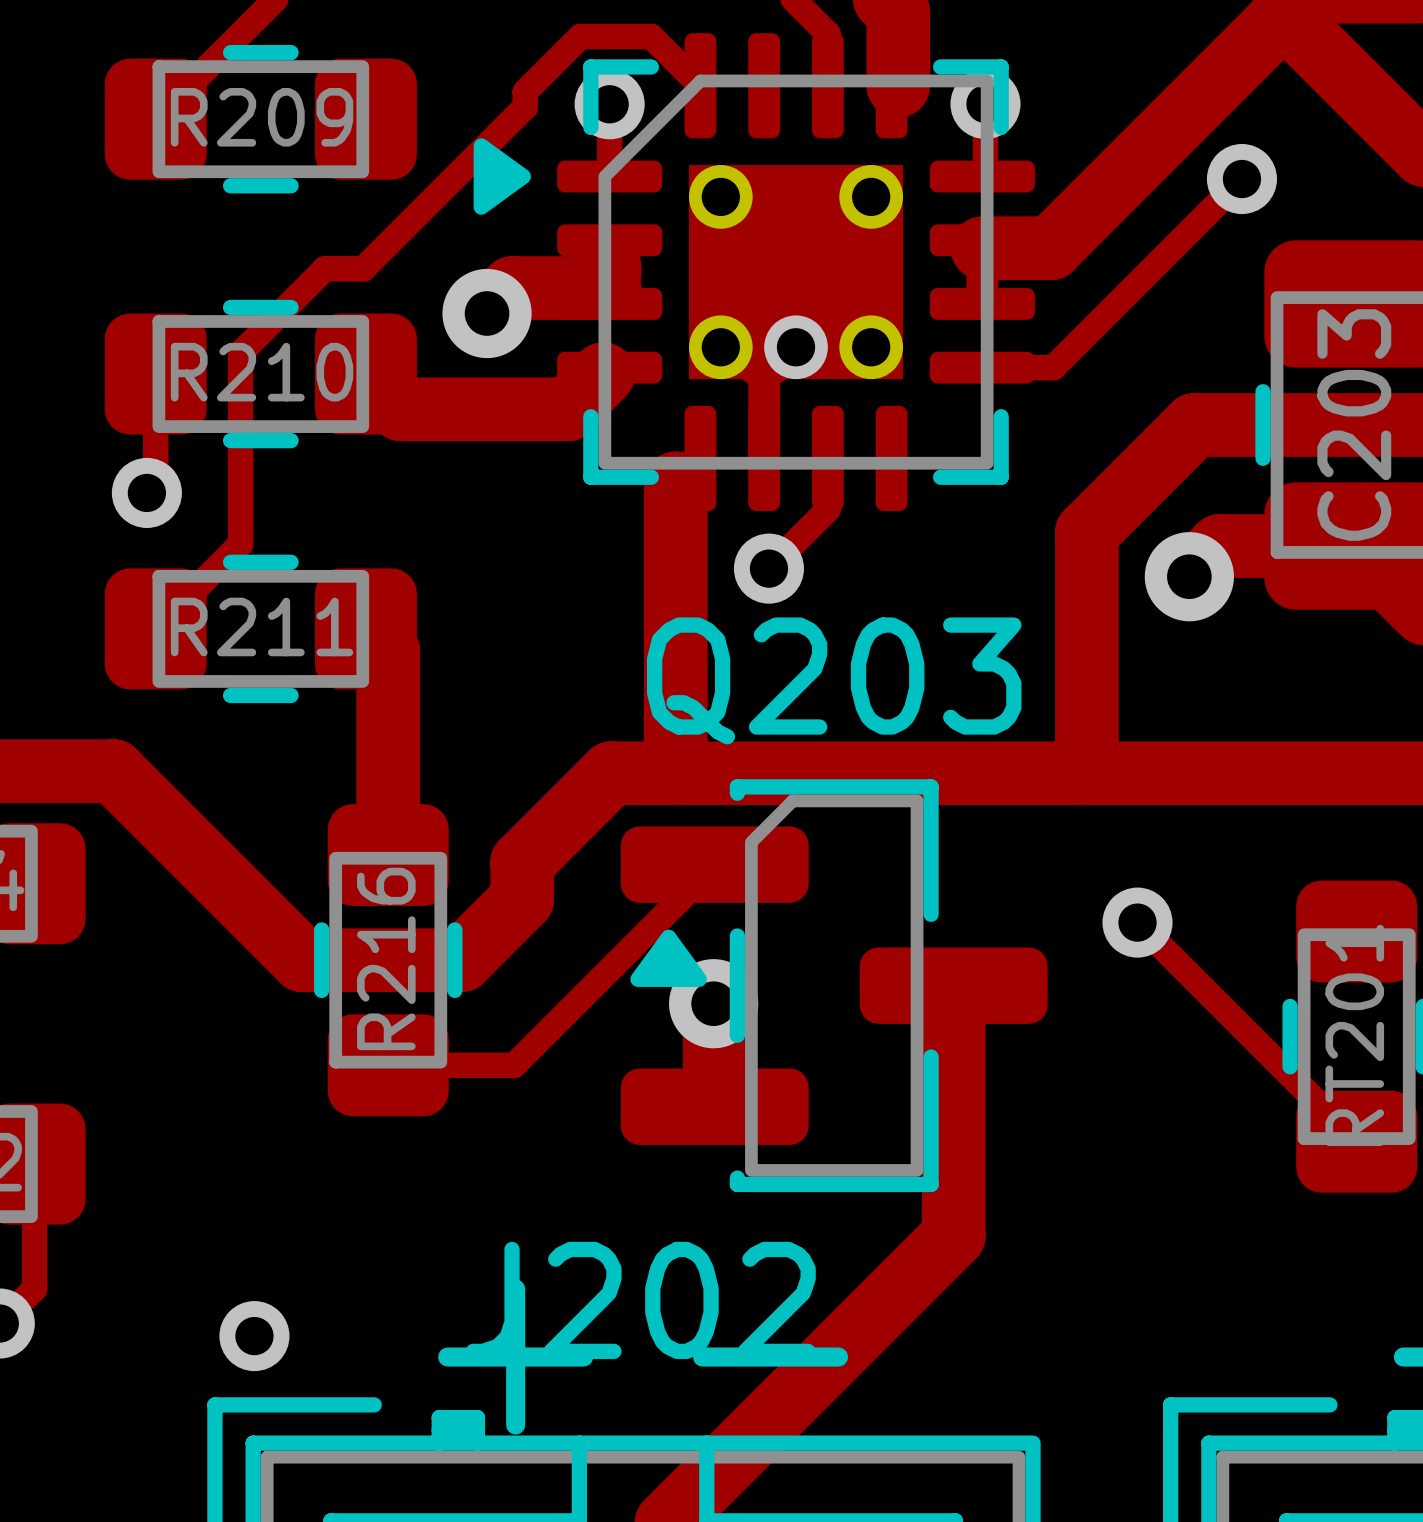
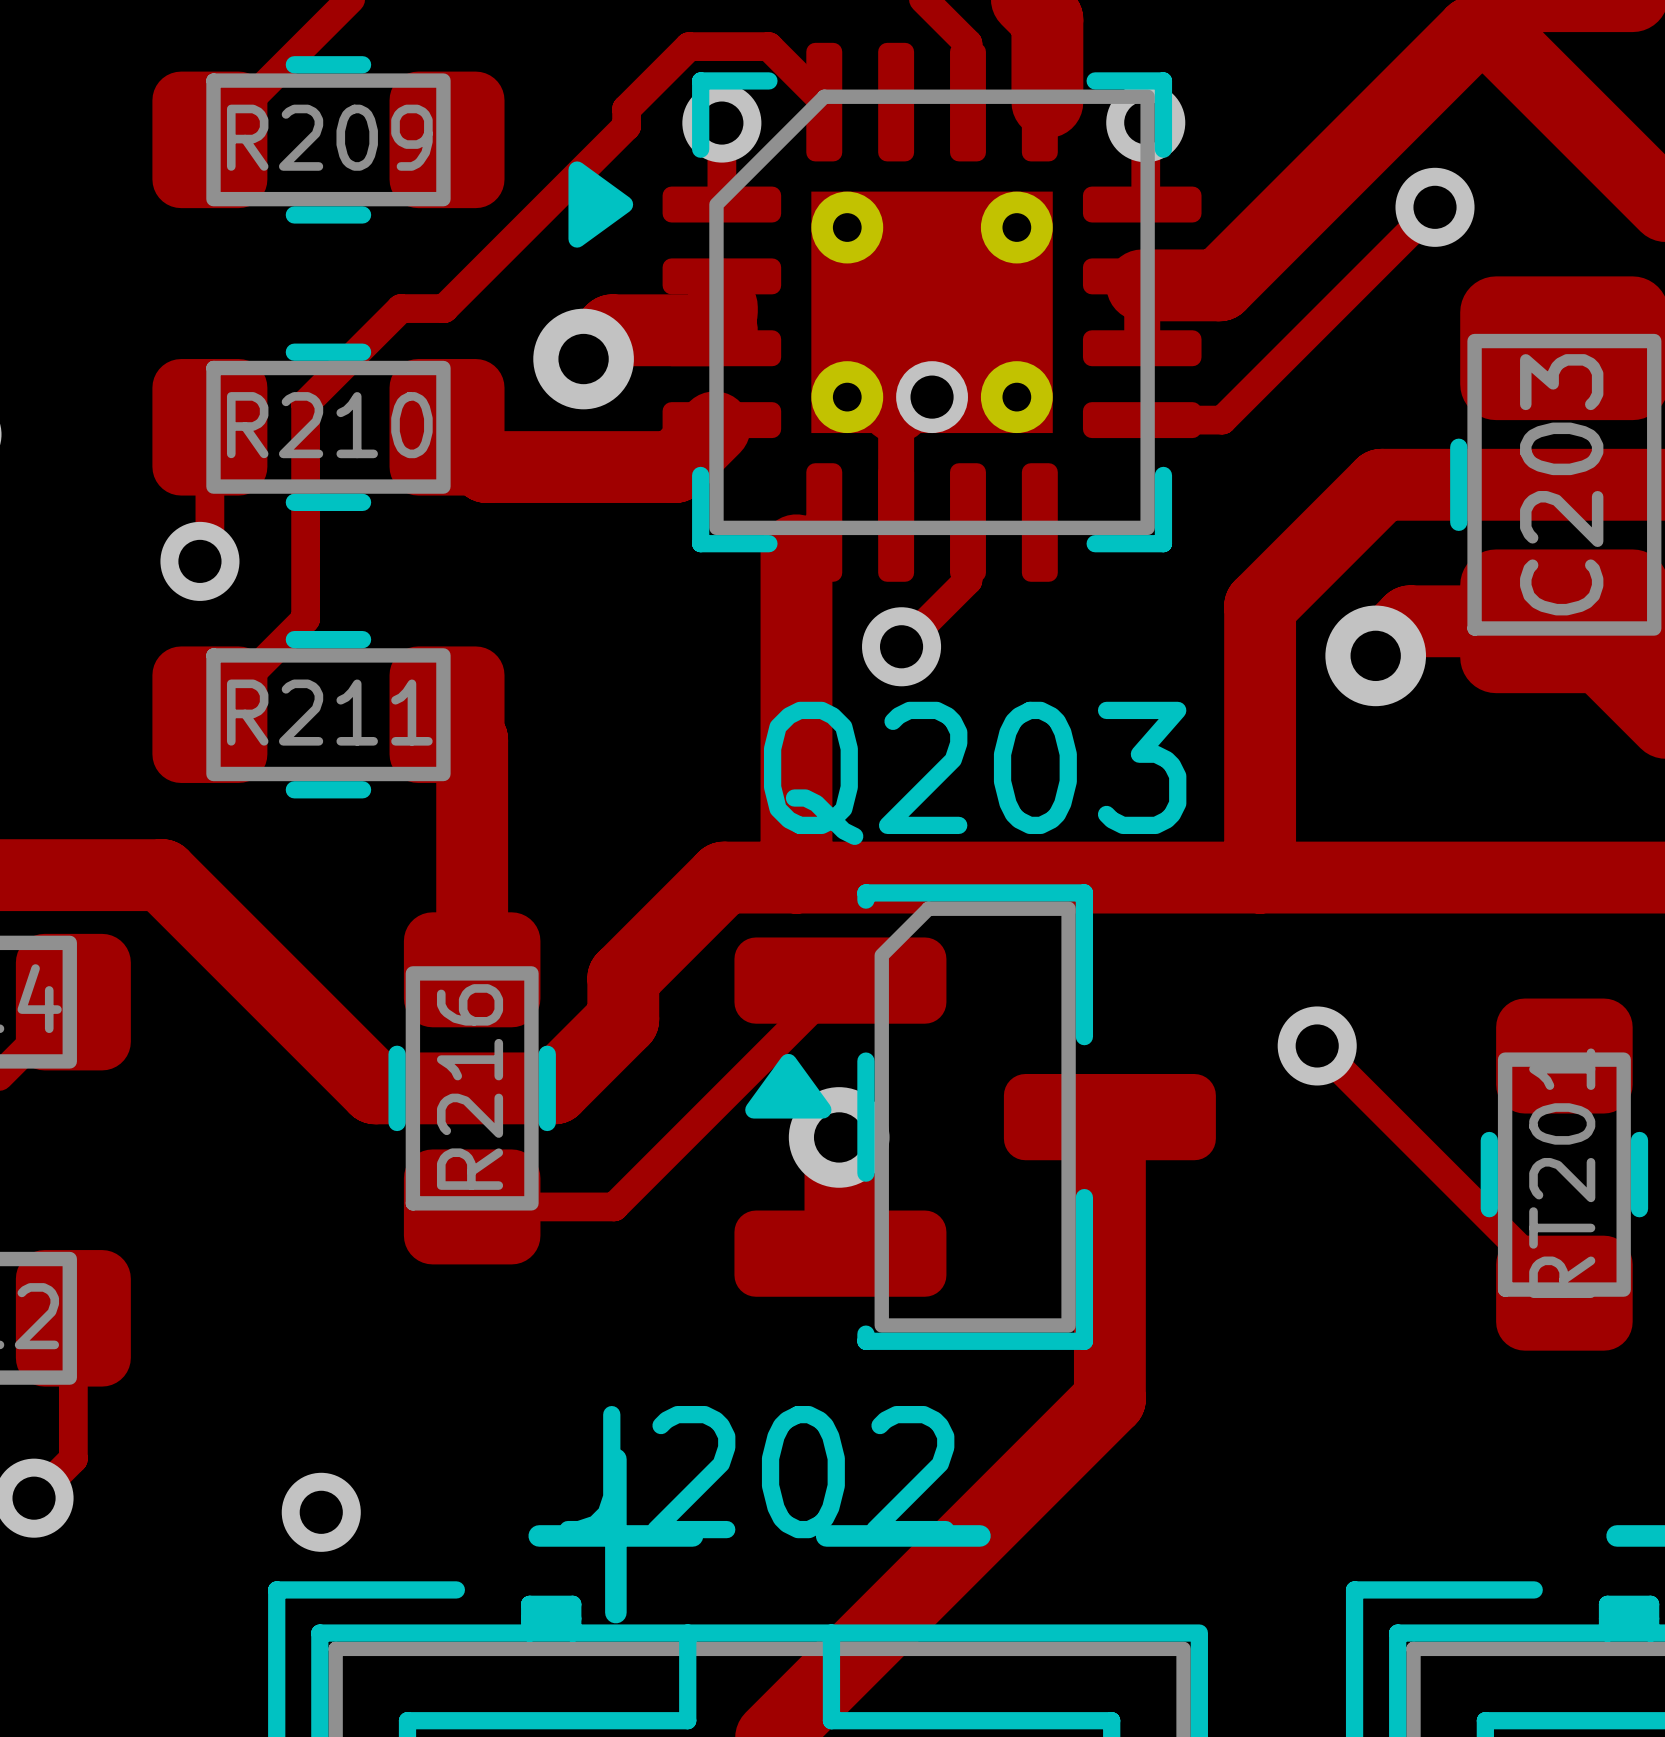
part footprint: [473, 33, 1035, 512] -> [568, 42, 1202, 582]

